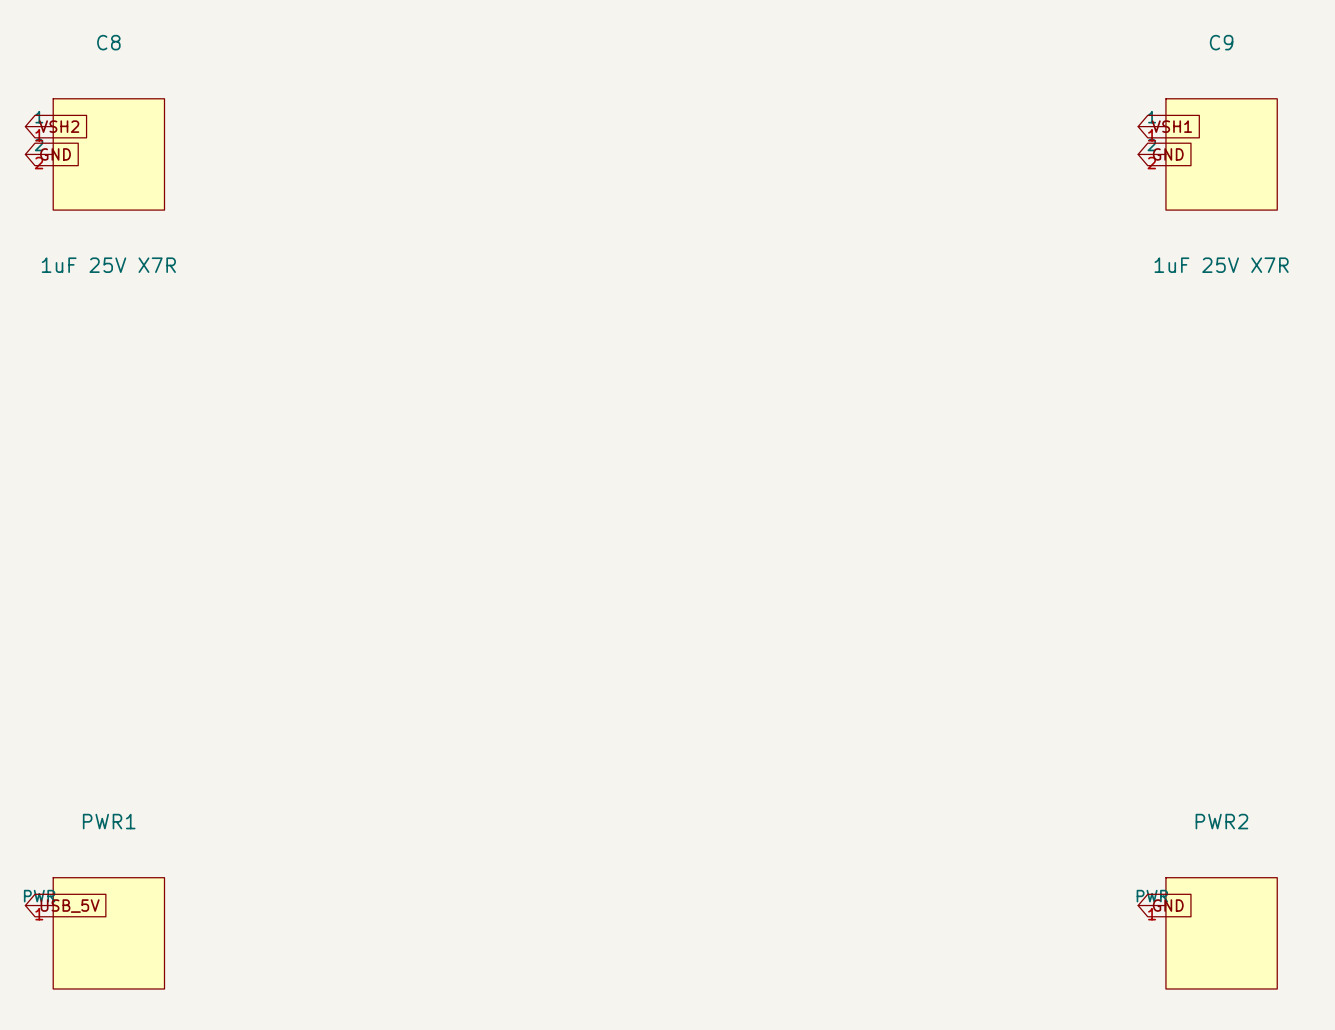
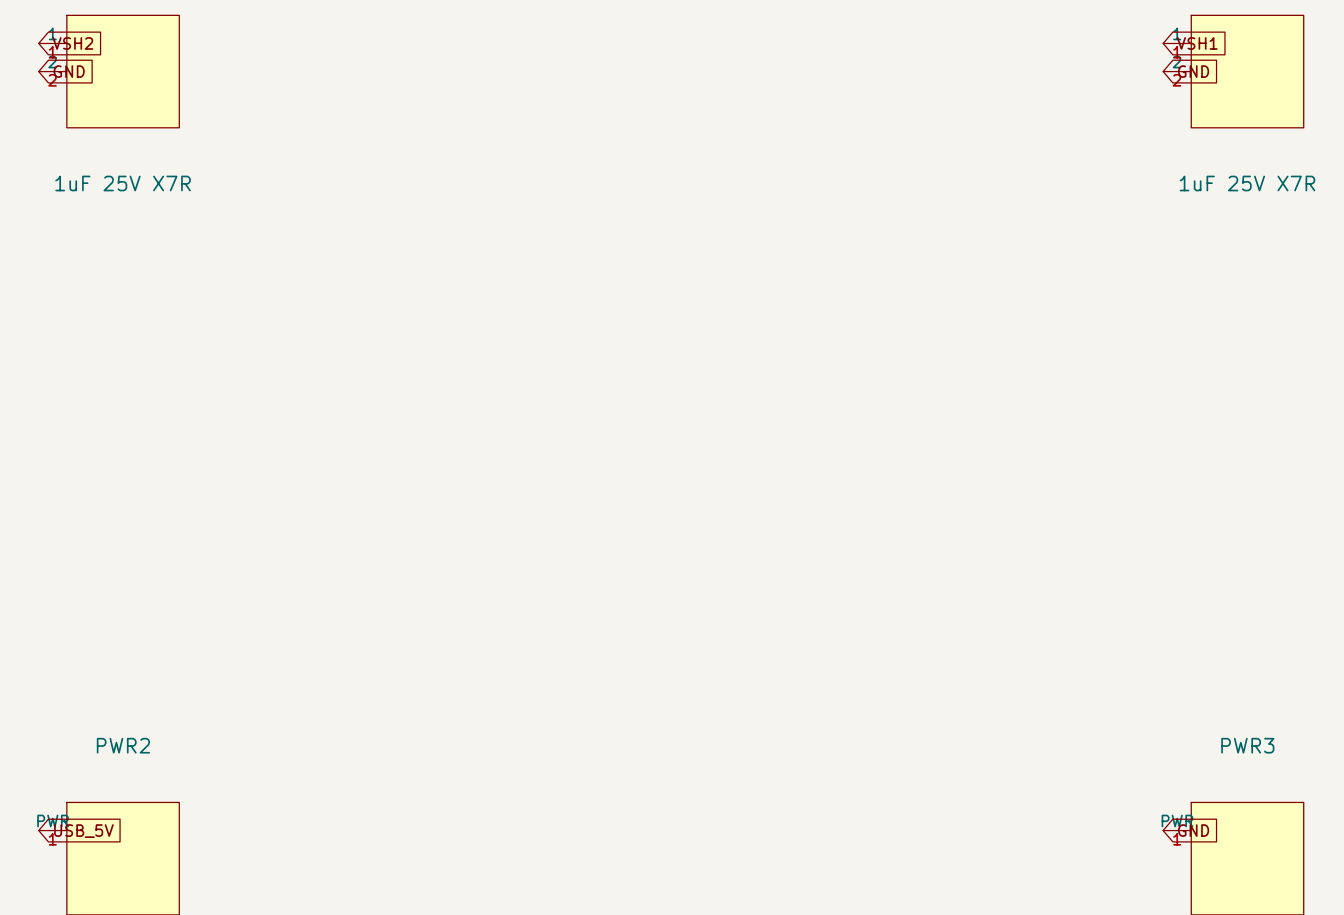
PWR1 name: PWR1 (109, 821) -> PWR2 (123, 745)
PWR2 name: PWR2 (1221, 821) -> PWR3 (1247, 745)

